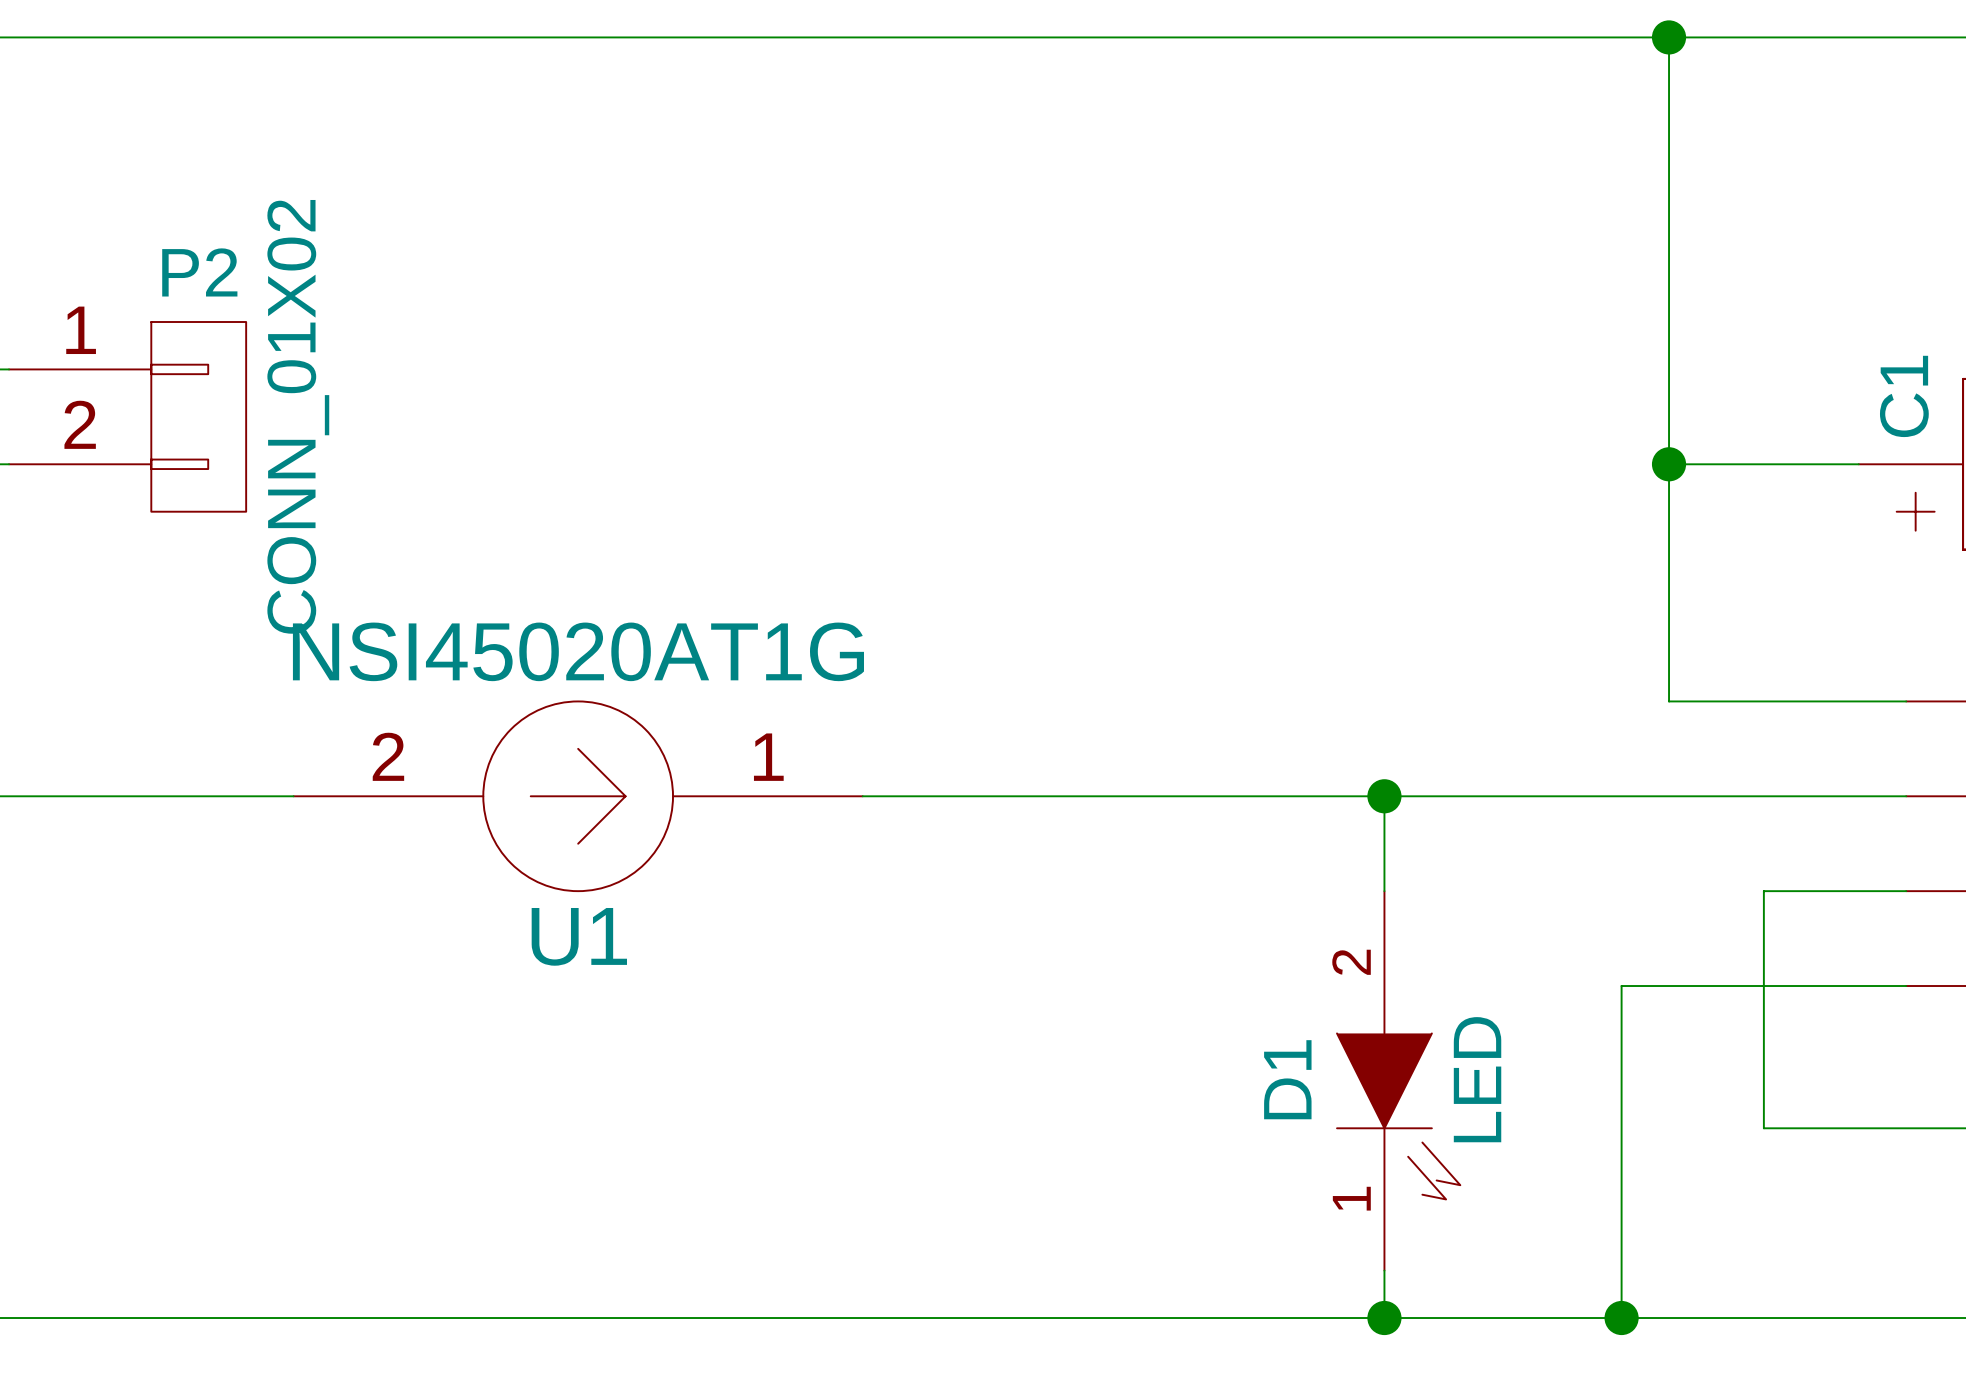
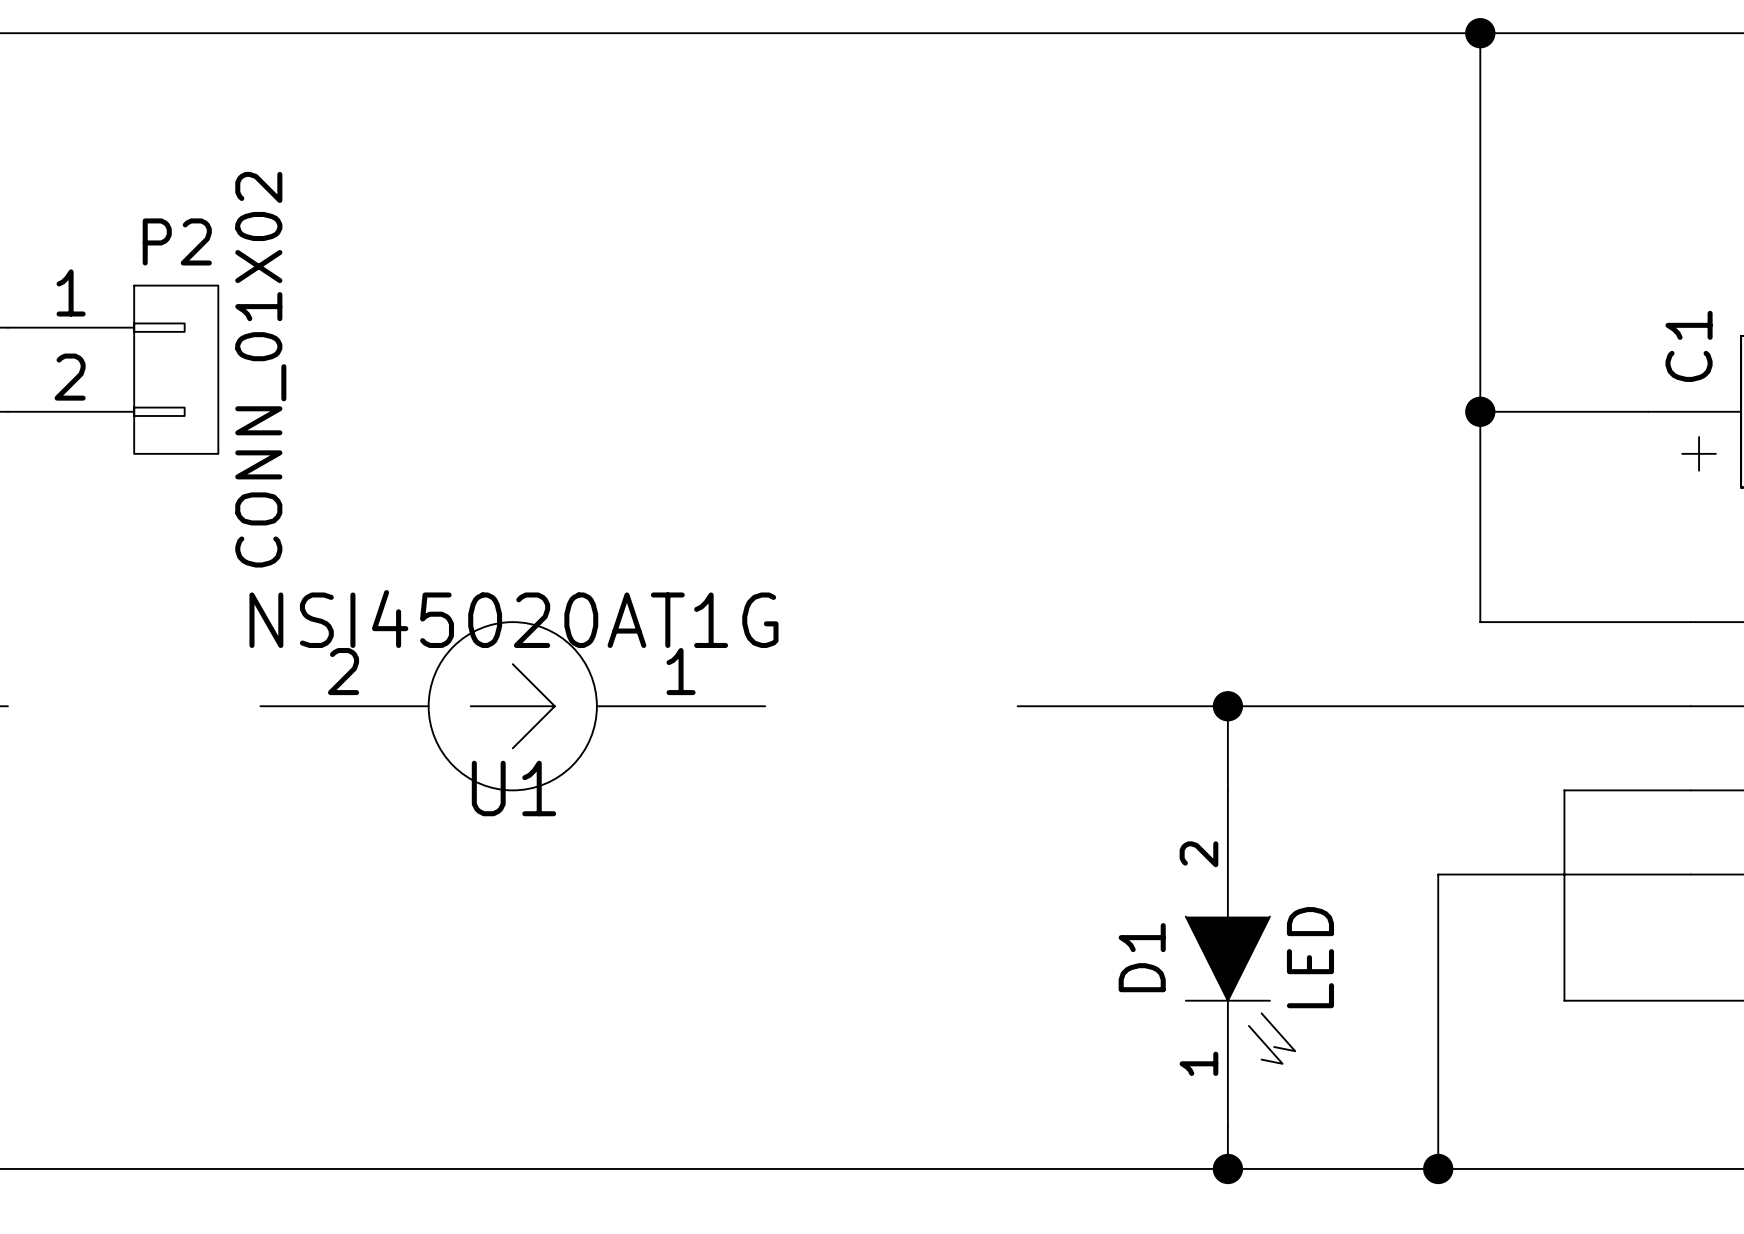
U1 value position: NSI45020AT1G (578, 651) -> NSI45020AT1G (513, 619)
wire: (9, 796) (293, 796) -> none
wire: (862, 796) (1147, 796) -> none
U1 name position: U1 (579, 936) -> U1 (513, 788)

